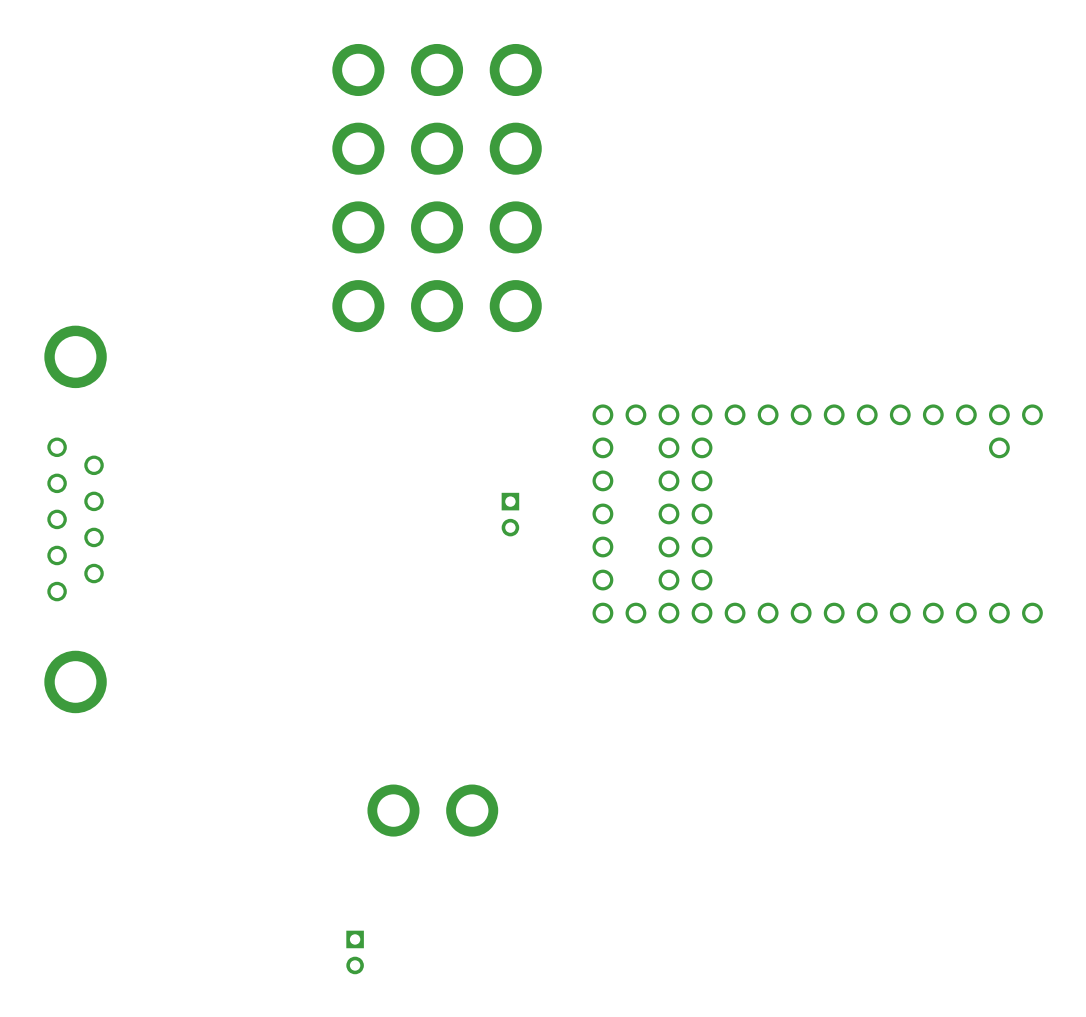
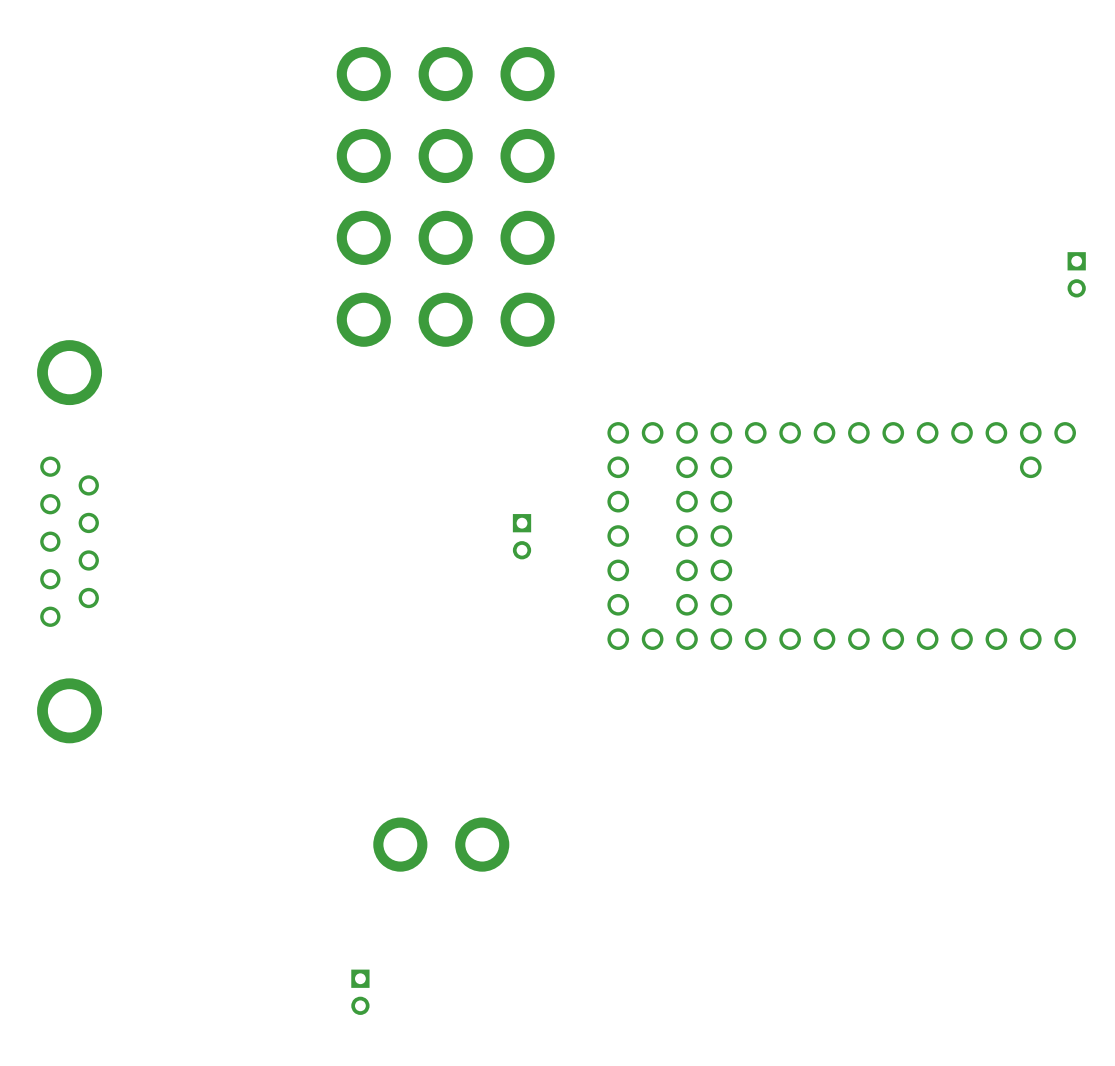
part: none -> (1076, 274)

